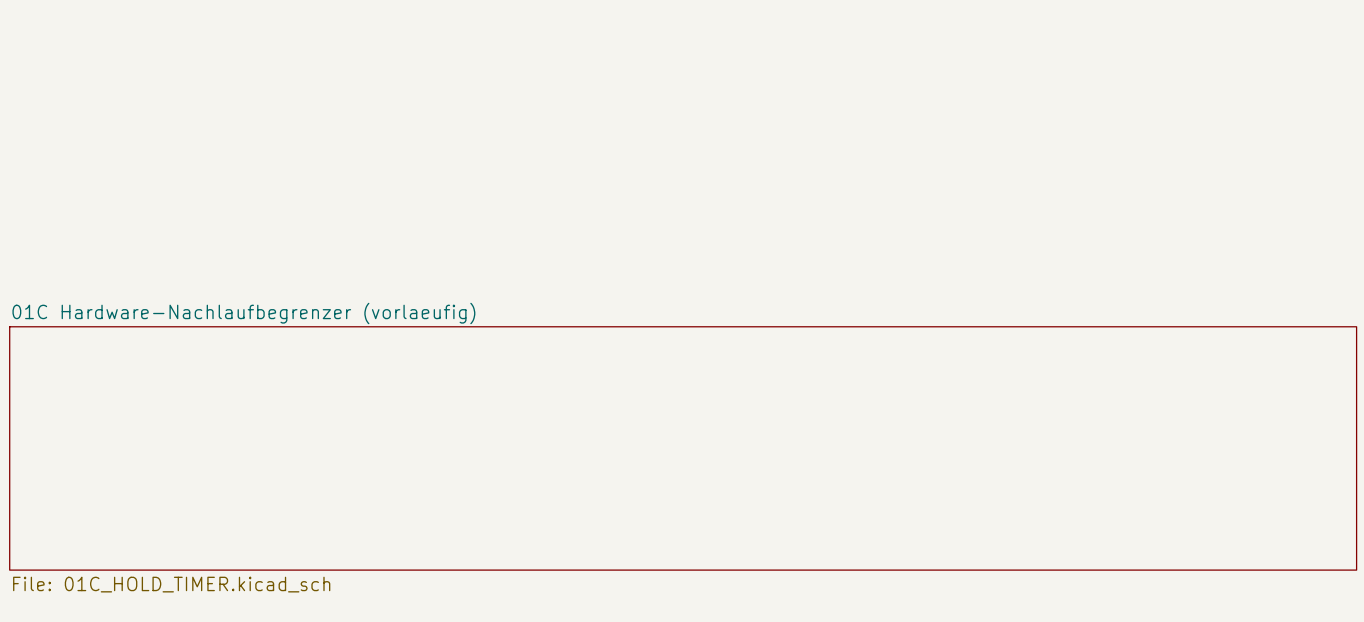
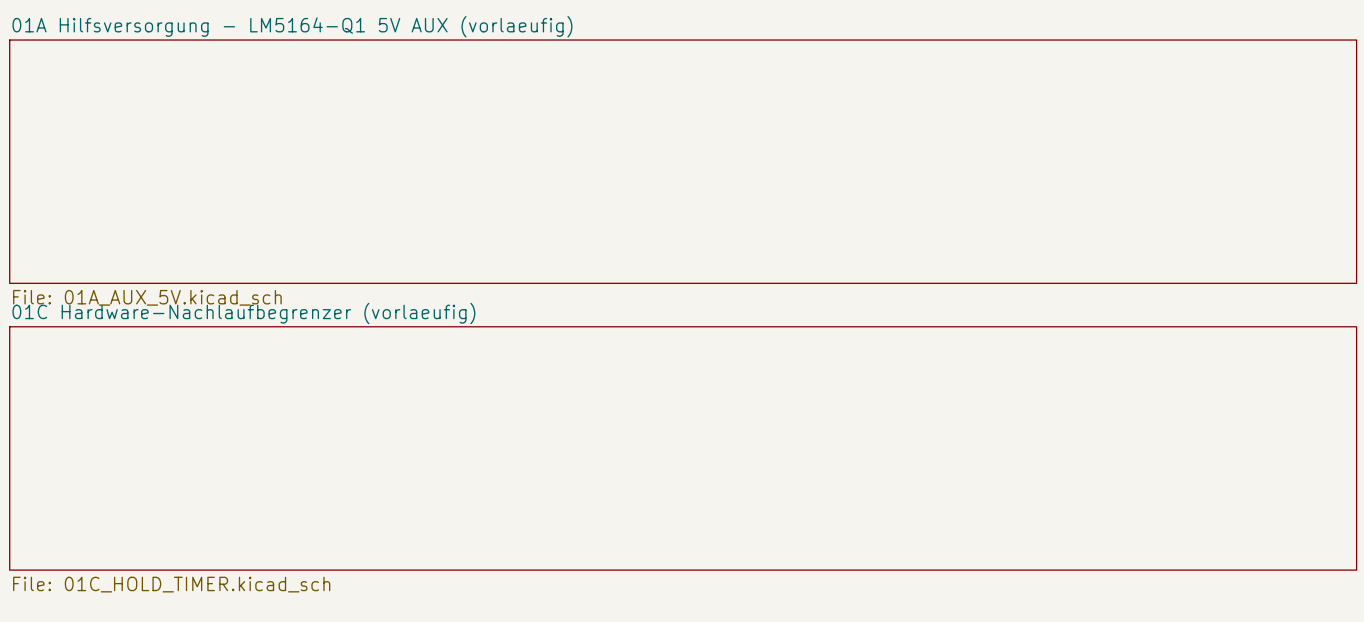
sheet 01A Hilfsversorgung - LM5164-Q1 5V AUX (vorlaeufig): none -> File: 01A_AUX_5V.kicad_sch (683, 161)

